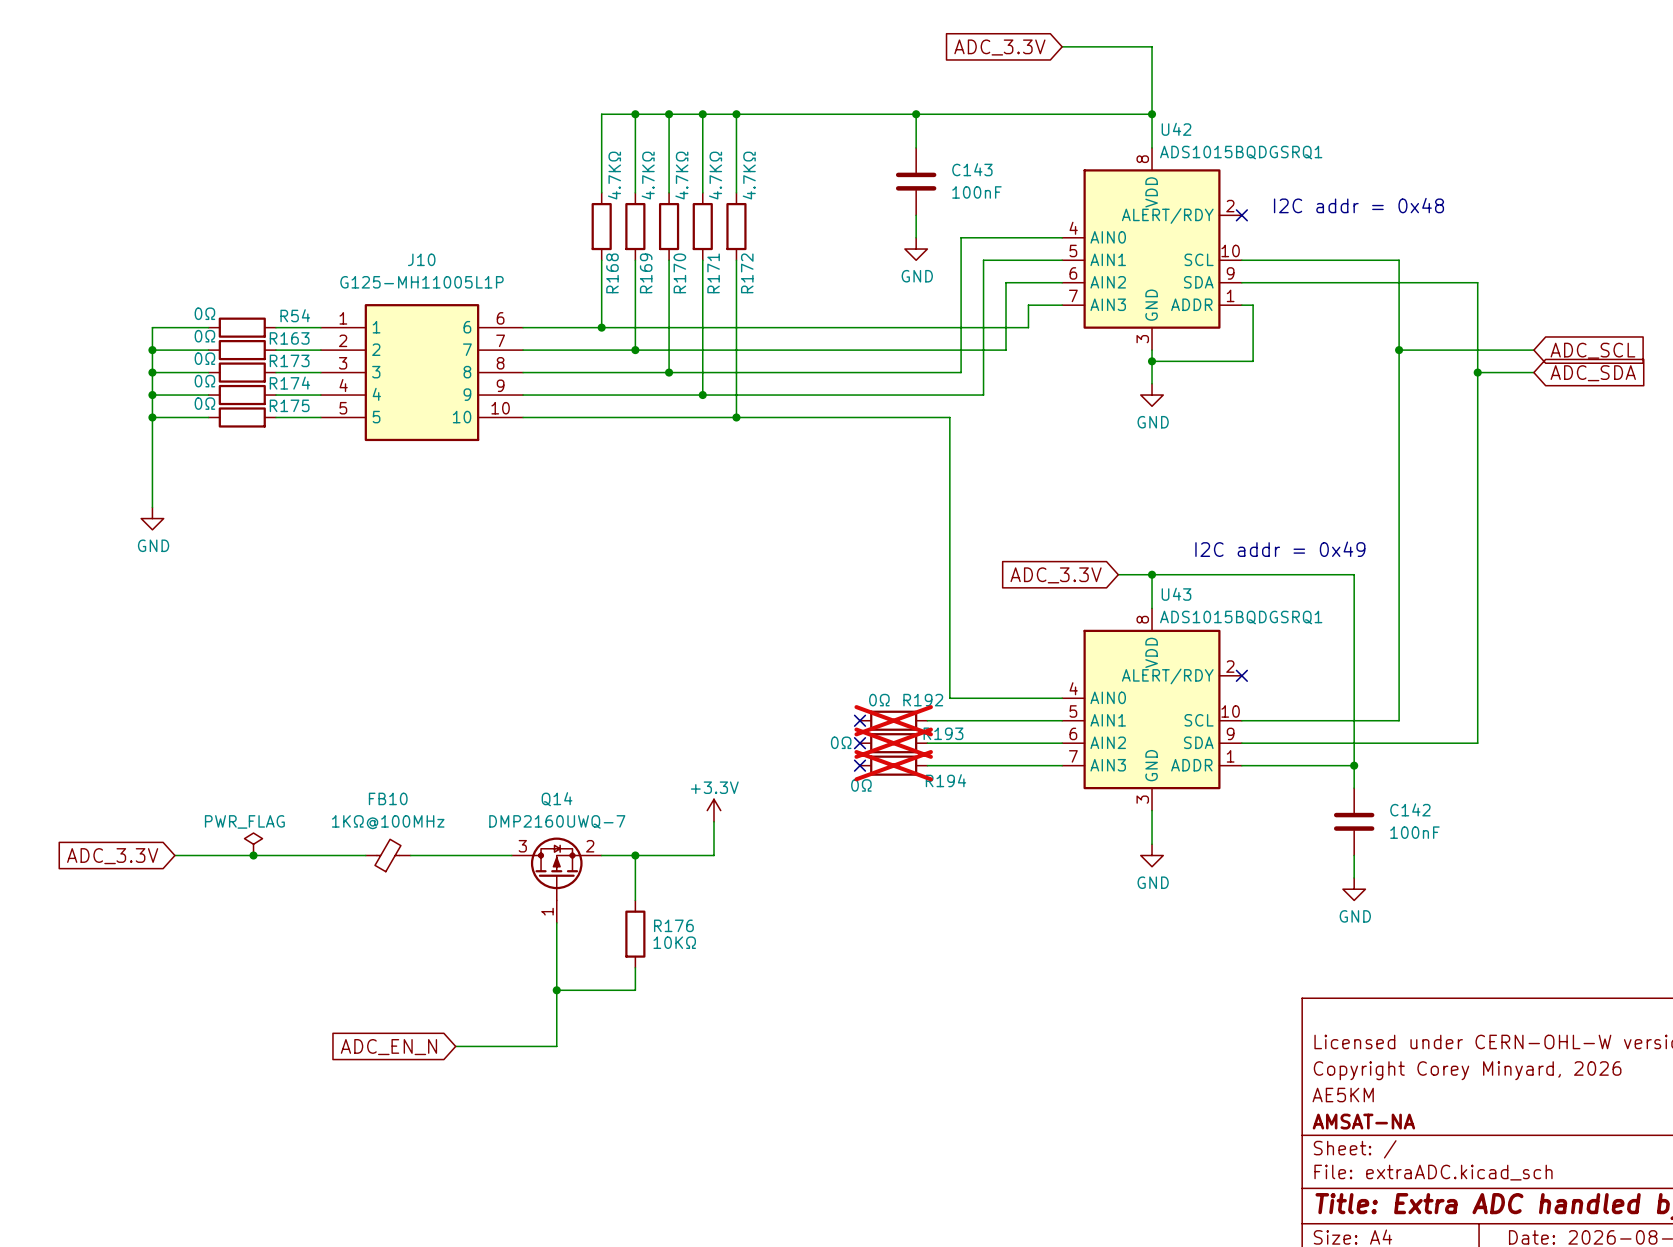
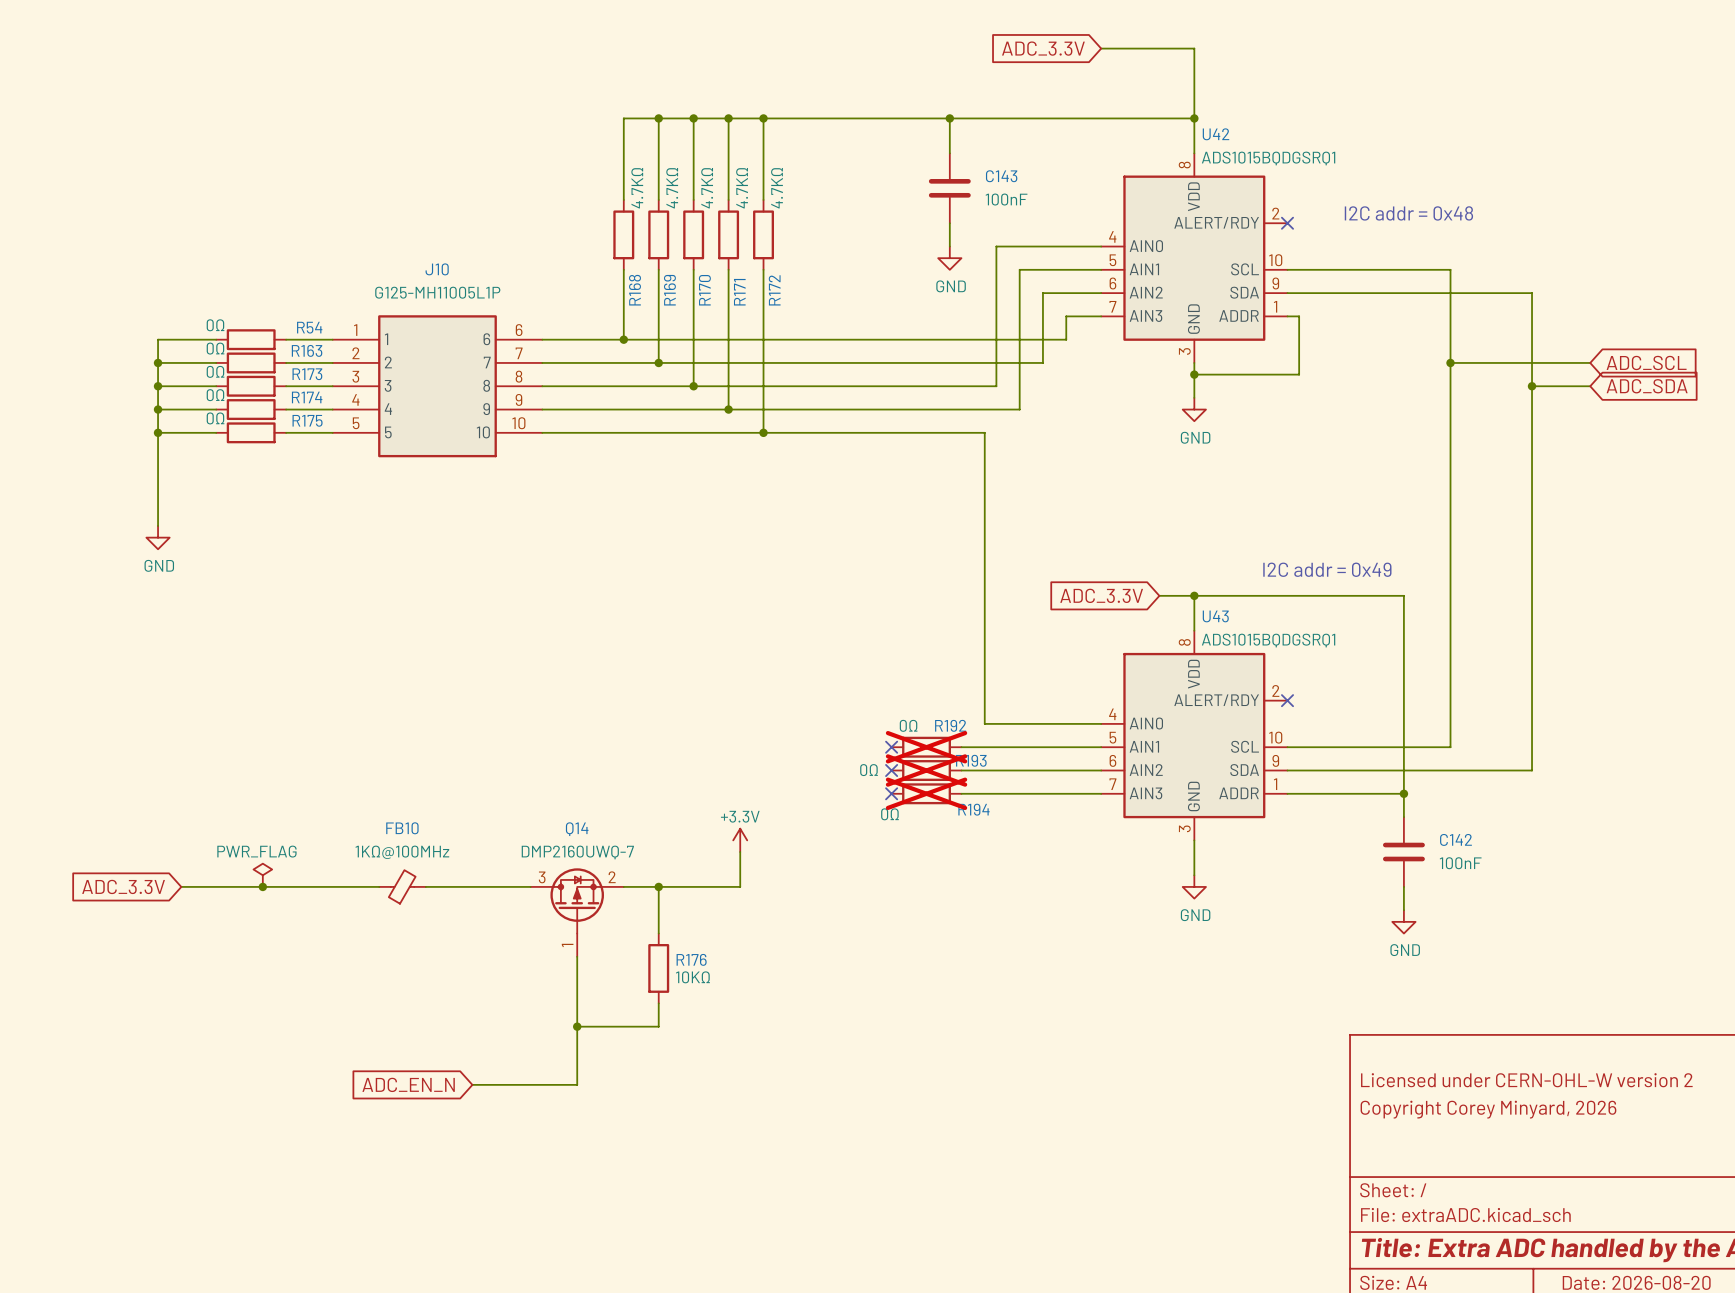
title block: AE5KM (1343, 1095) -> none
title block: AMSAT-NA (1363, 1121) -> none

